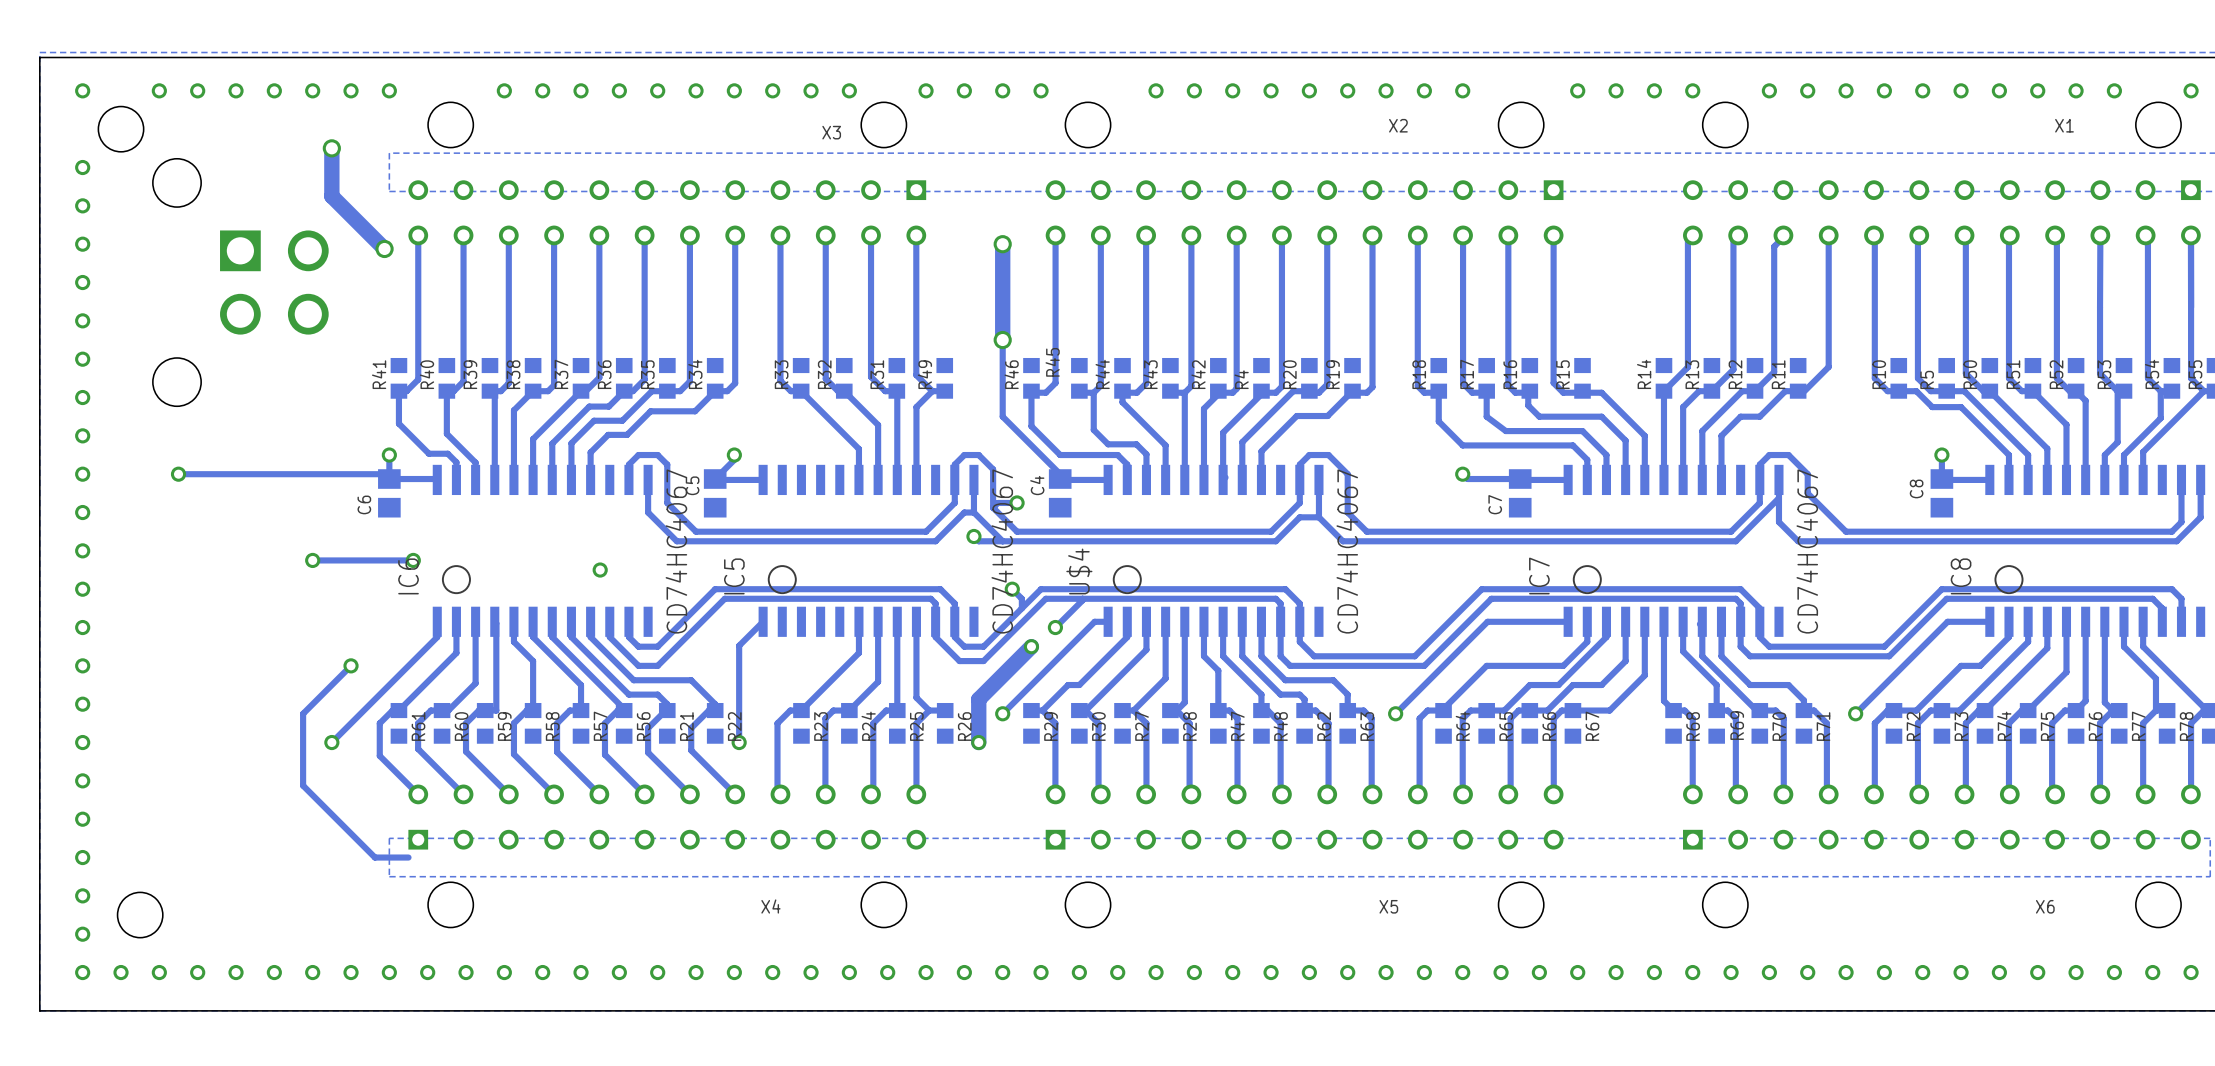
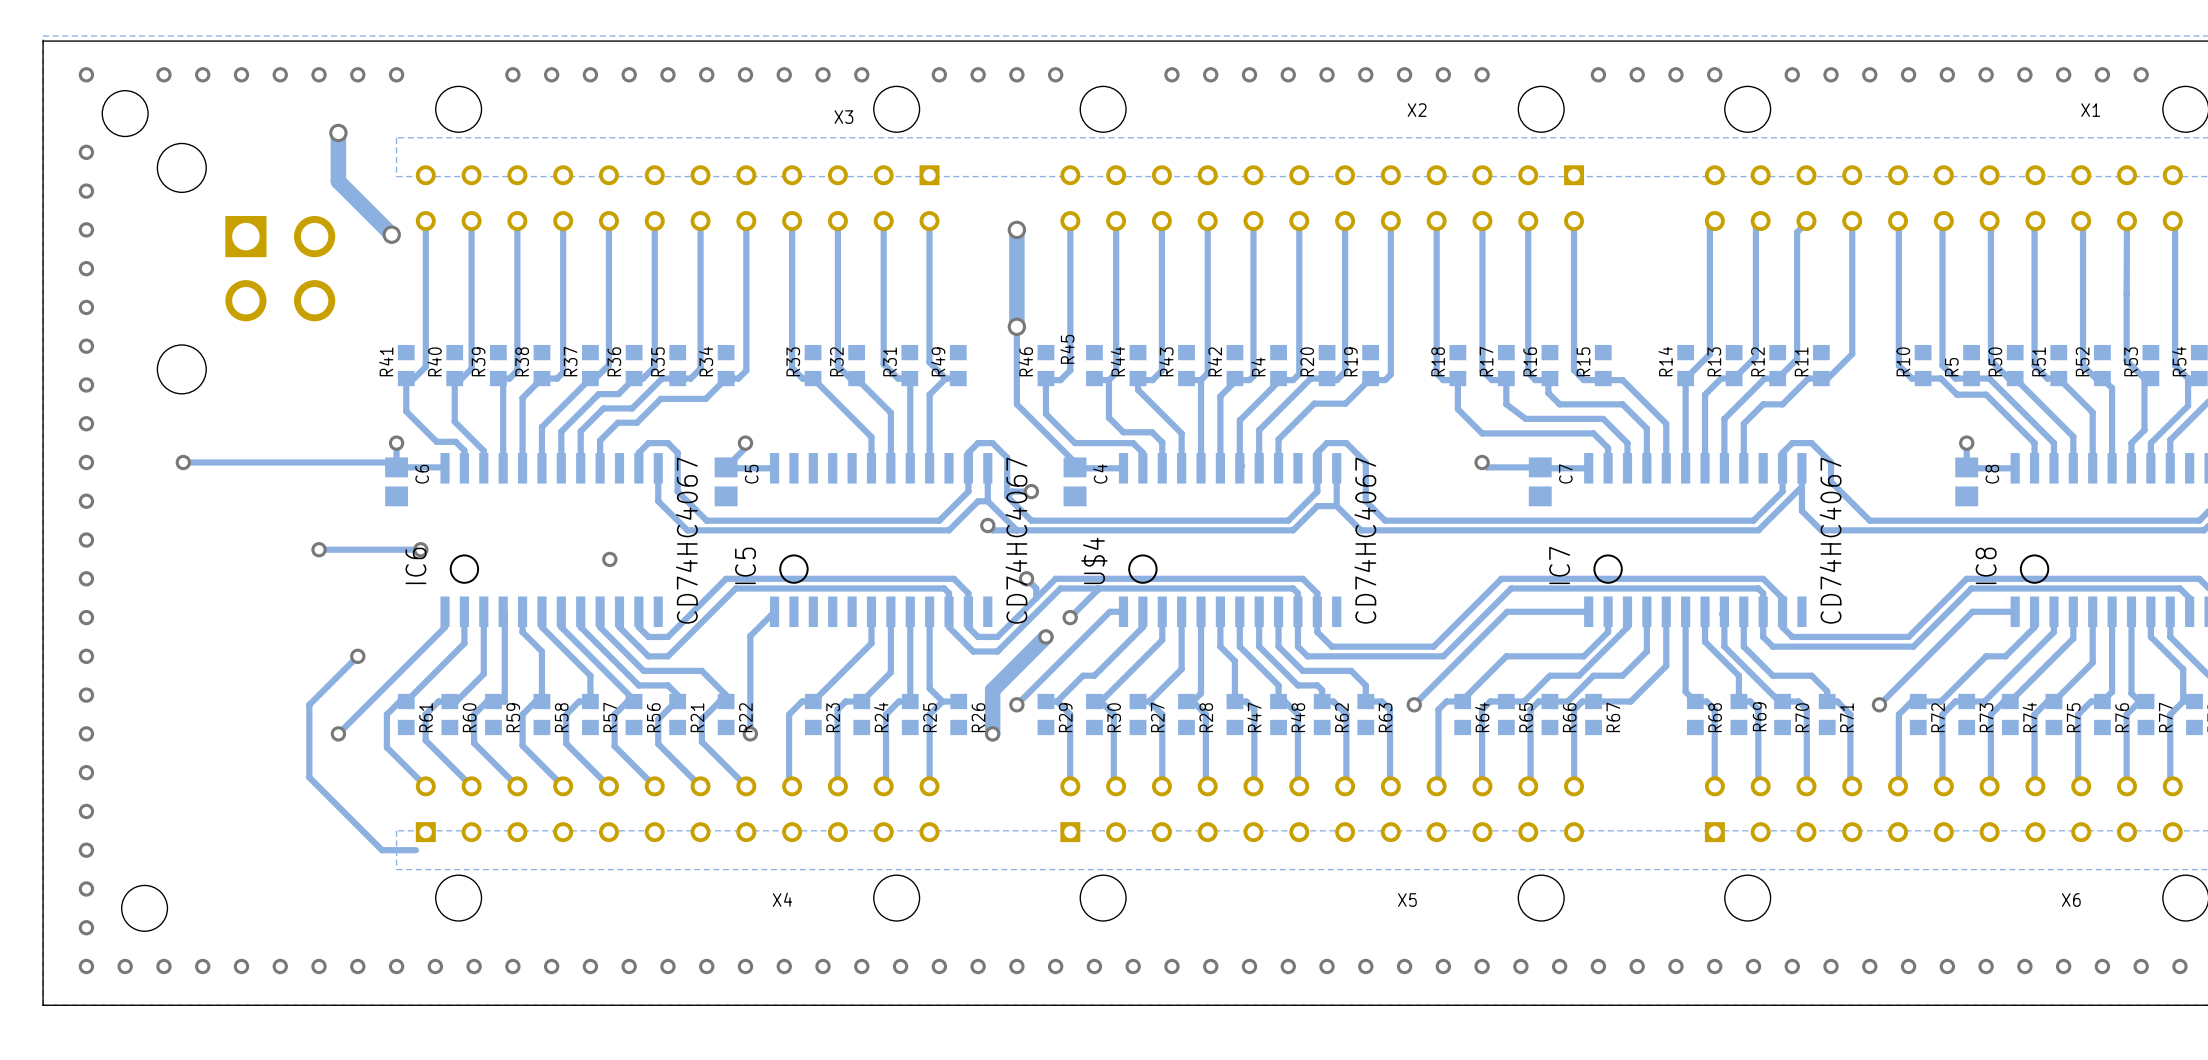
C5 name position: C5 (692, 485) -> C5 (751, 474)
C4 name position: C4 (1037, 485) -> C4 (1100, 473)
C8 name position: C8 (1916, 488) -> C8 (1992, 474)
C6 name position: C6 (364, 504) -> C6 (422, 474)
C7 name position: C7 (1495, 504) -> C7 (1565, 473)

